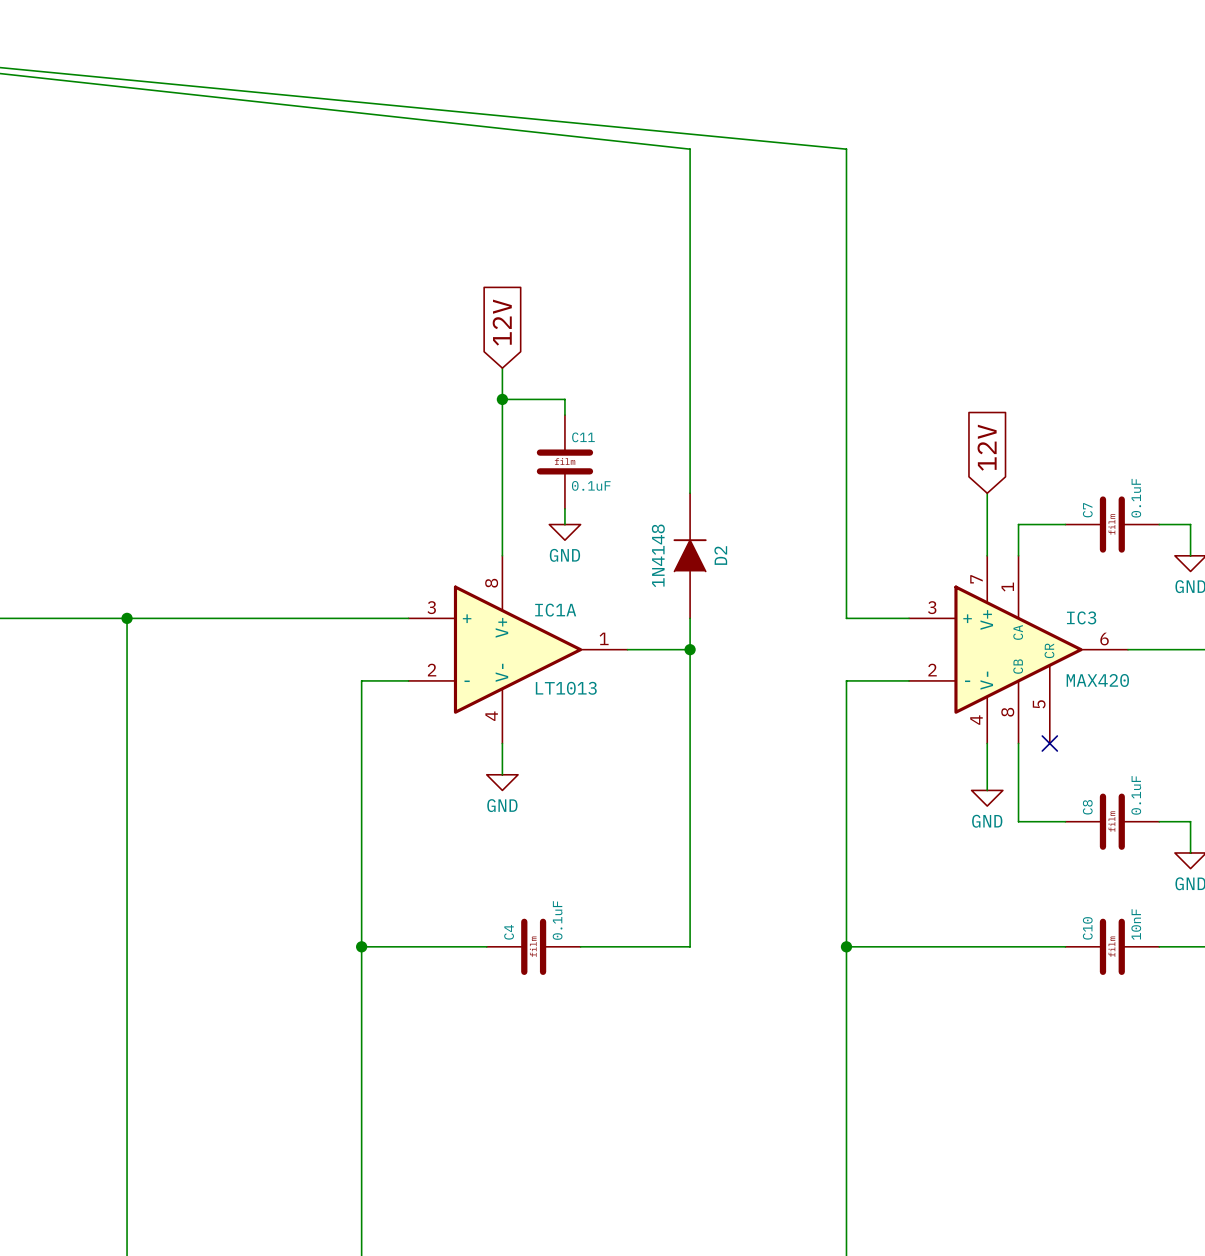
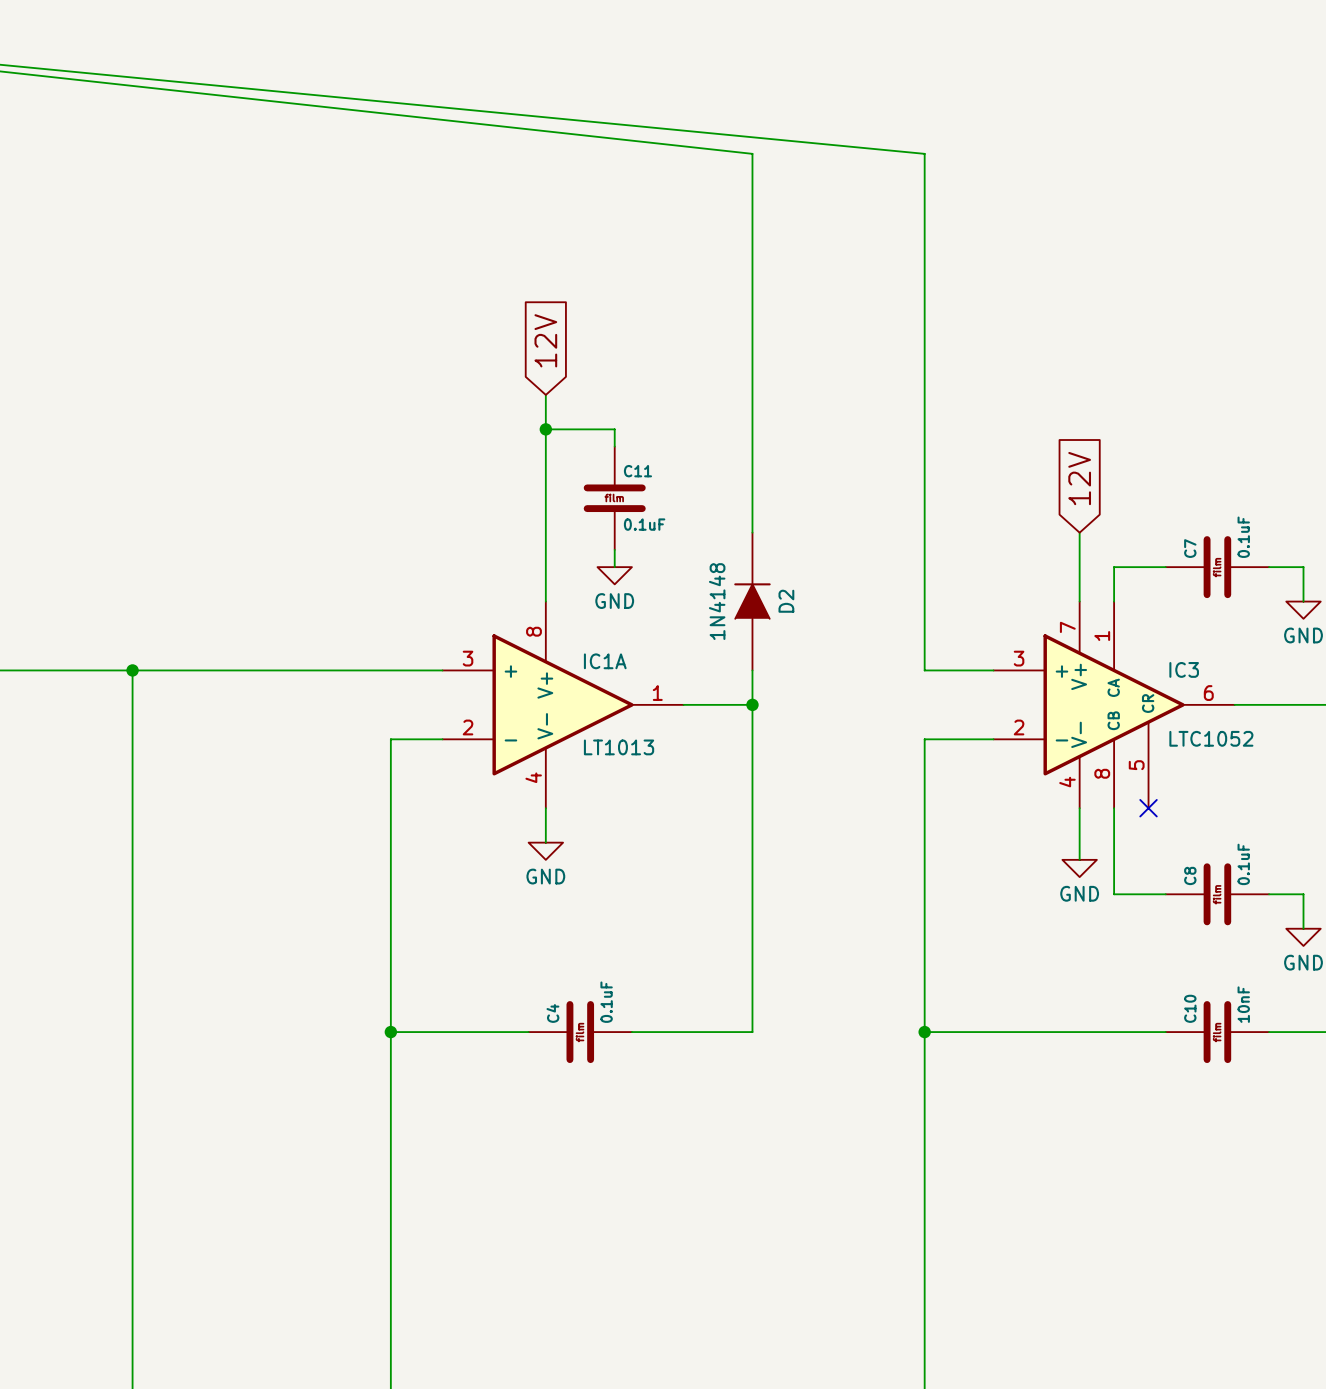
IC3 value: MAX420 (1097, 680) -> LTC1052 (1211, 738)

